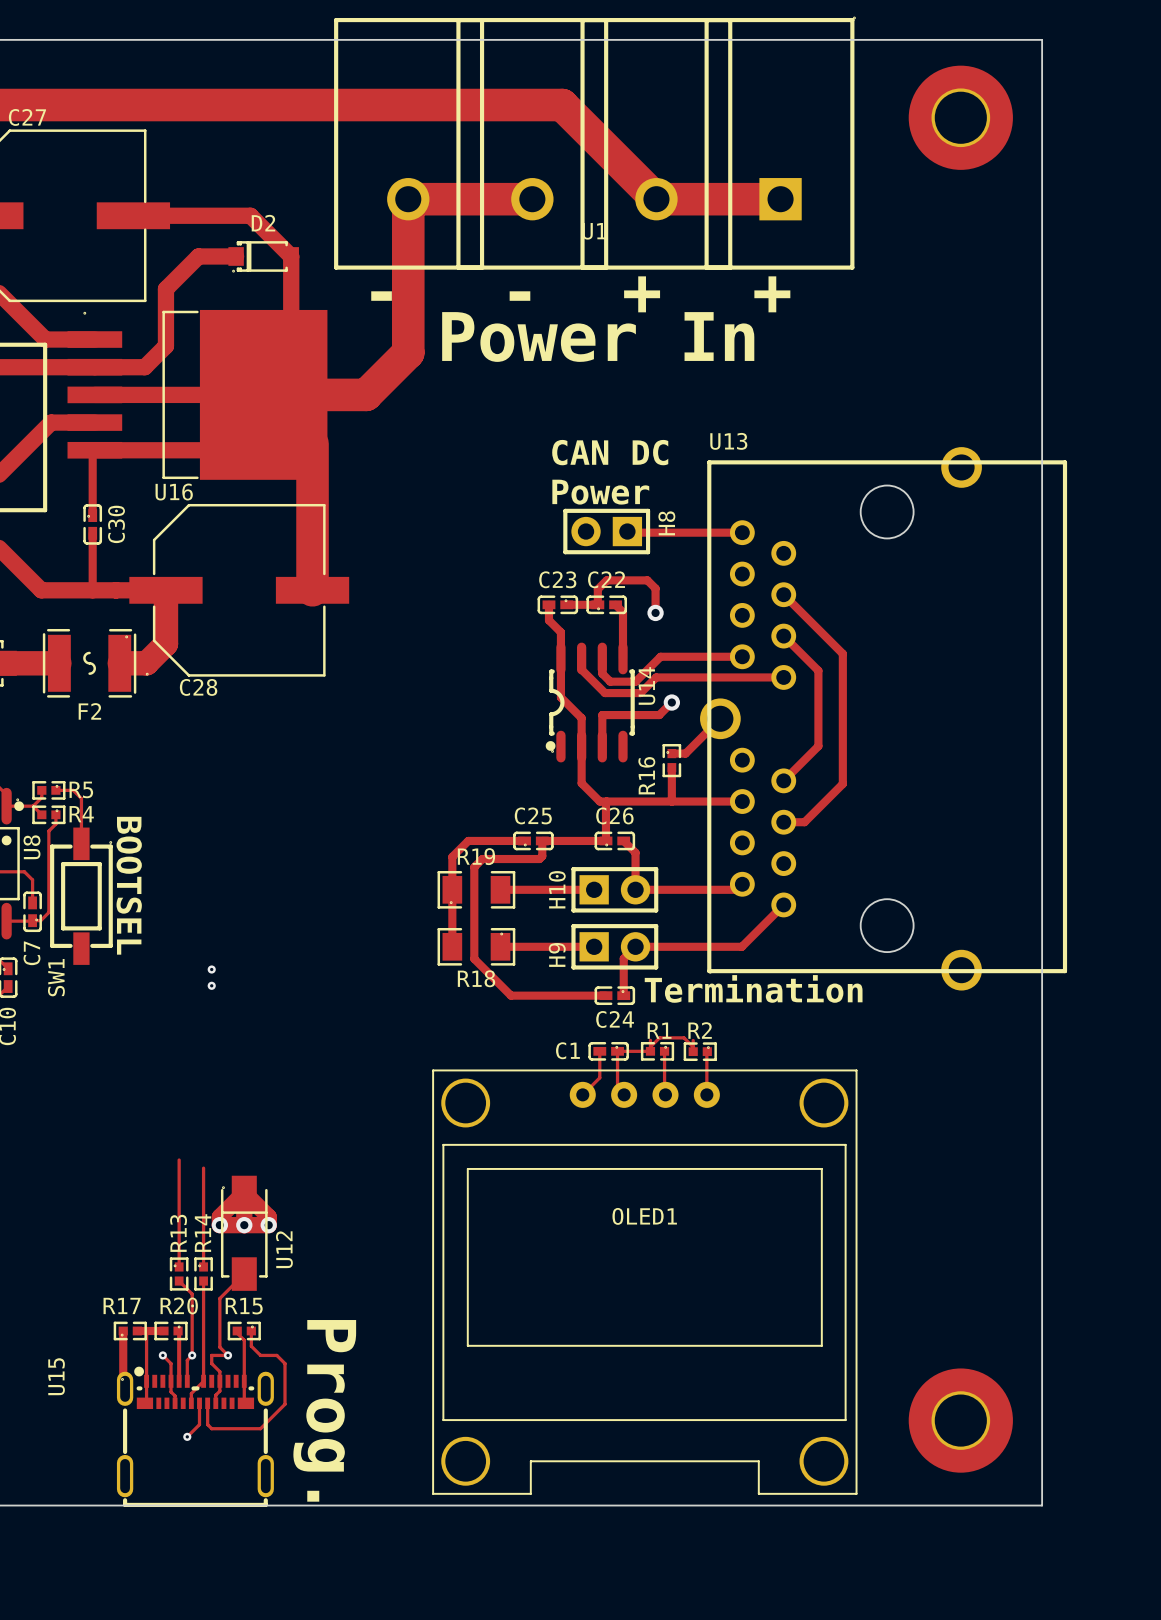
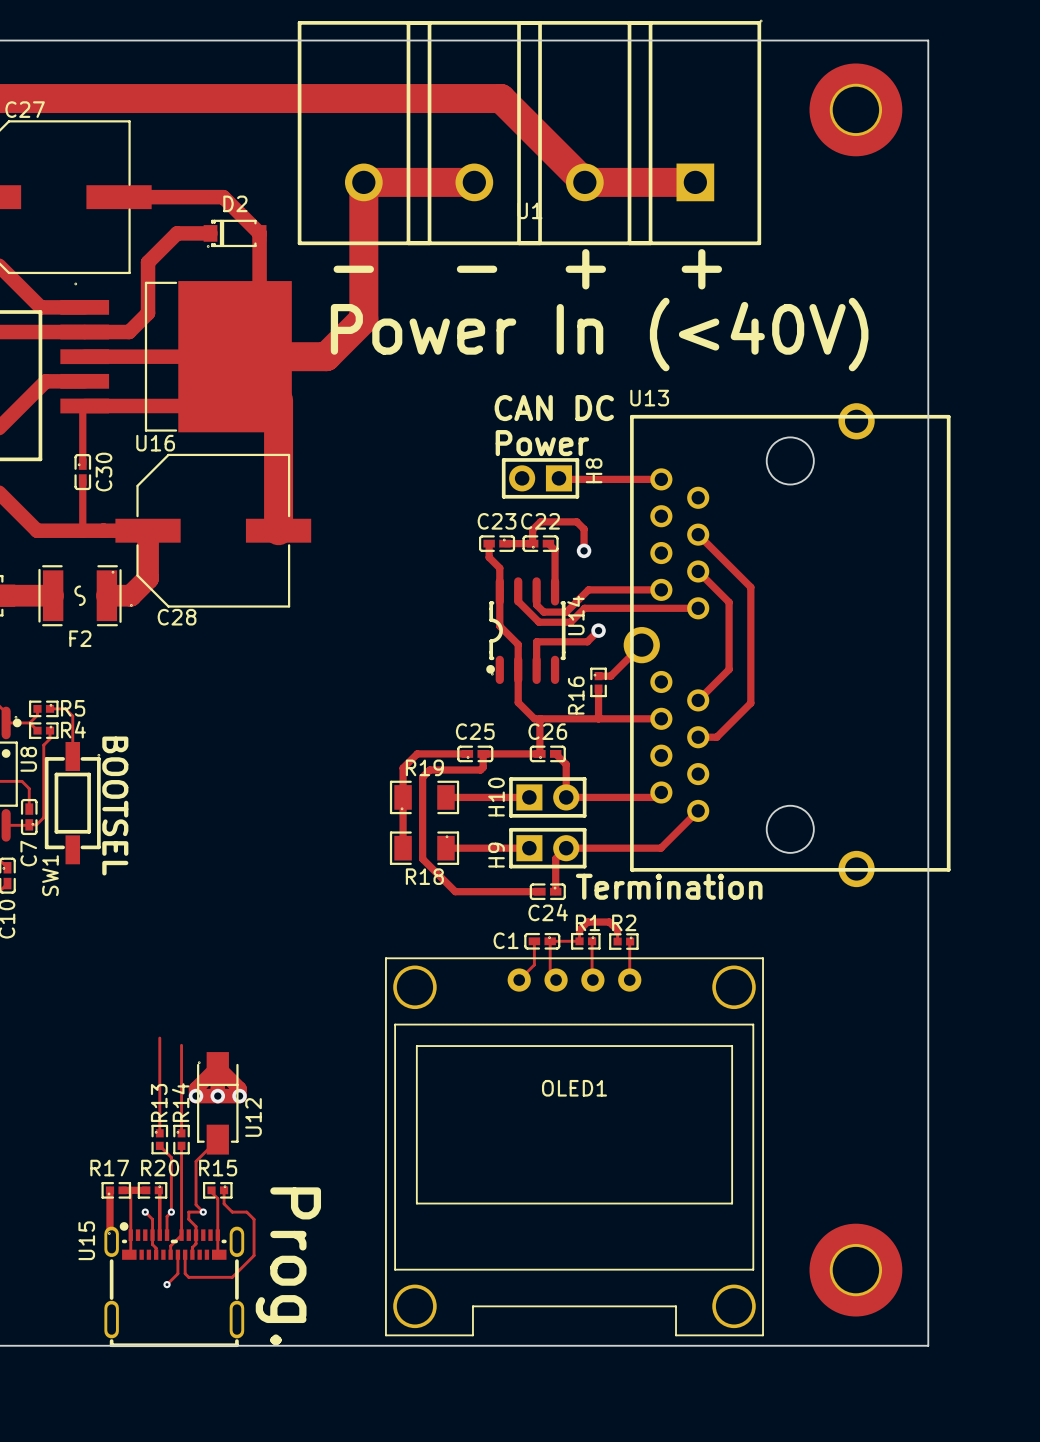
text: Power In (598, 337) -> Power In (<40V) (599, 334)
via: (211, 969) -> none
via: (211, 985) -> none
track: none -> (579, 931) (587, 922) (609, 922) (617, 931)
track: (650, 1046) (659, 1037) (683, 1037) (693, 1047) -> none
U15 name position: U15 (56, 1376) -> U15 (86, 1240)

